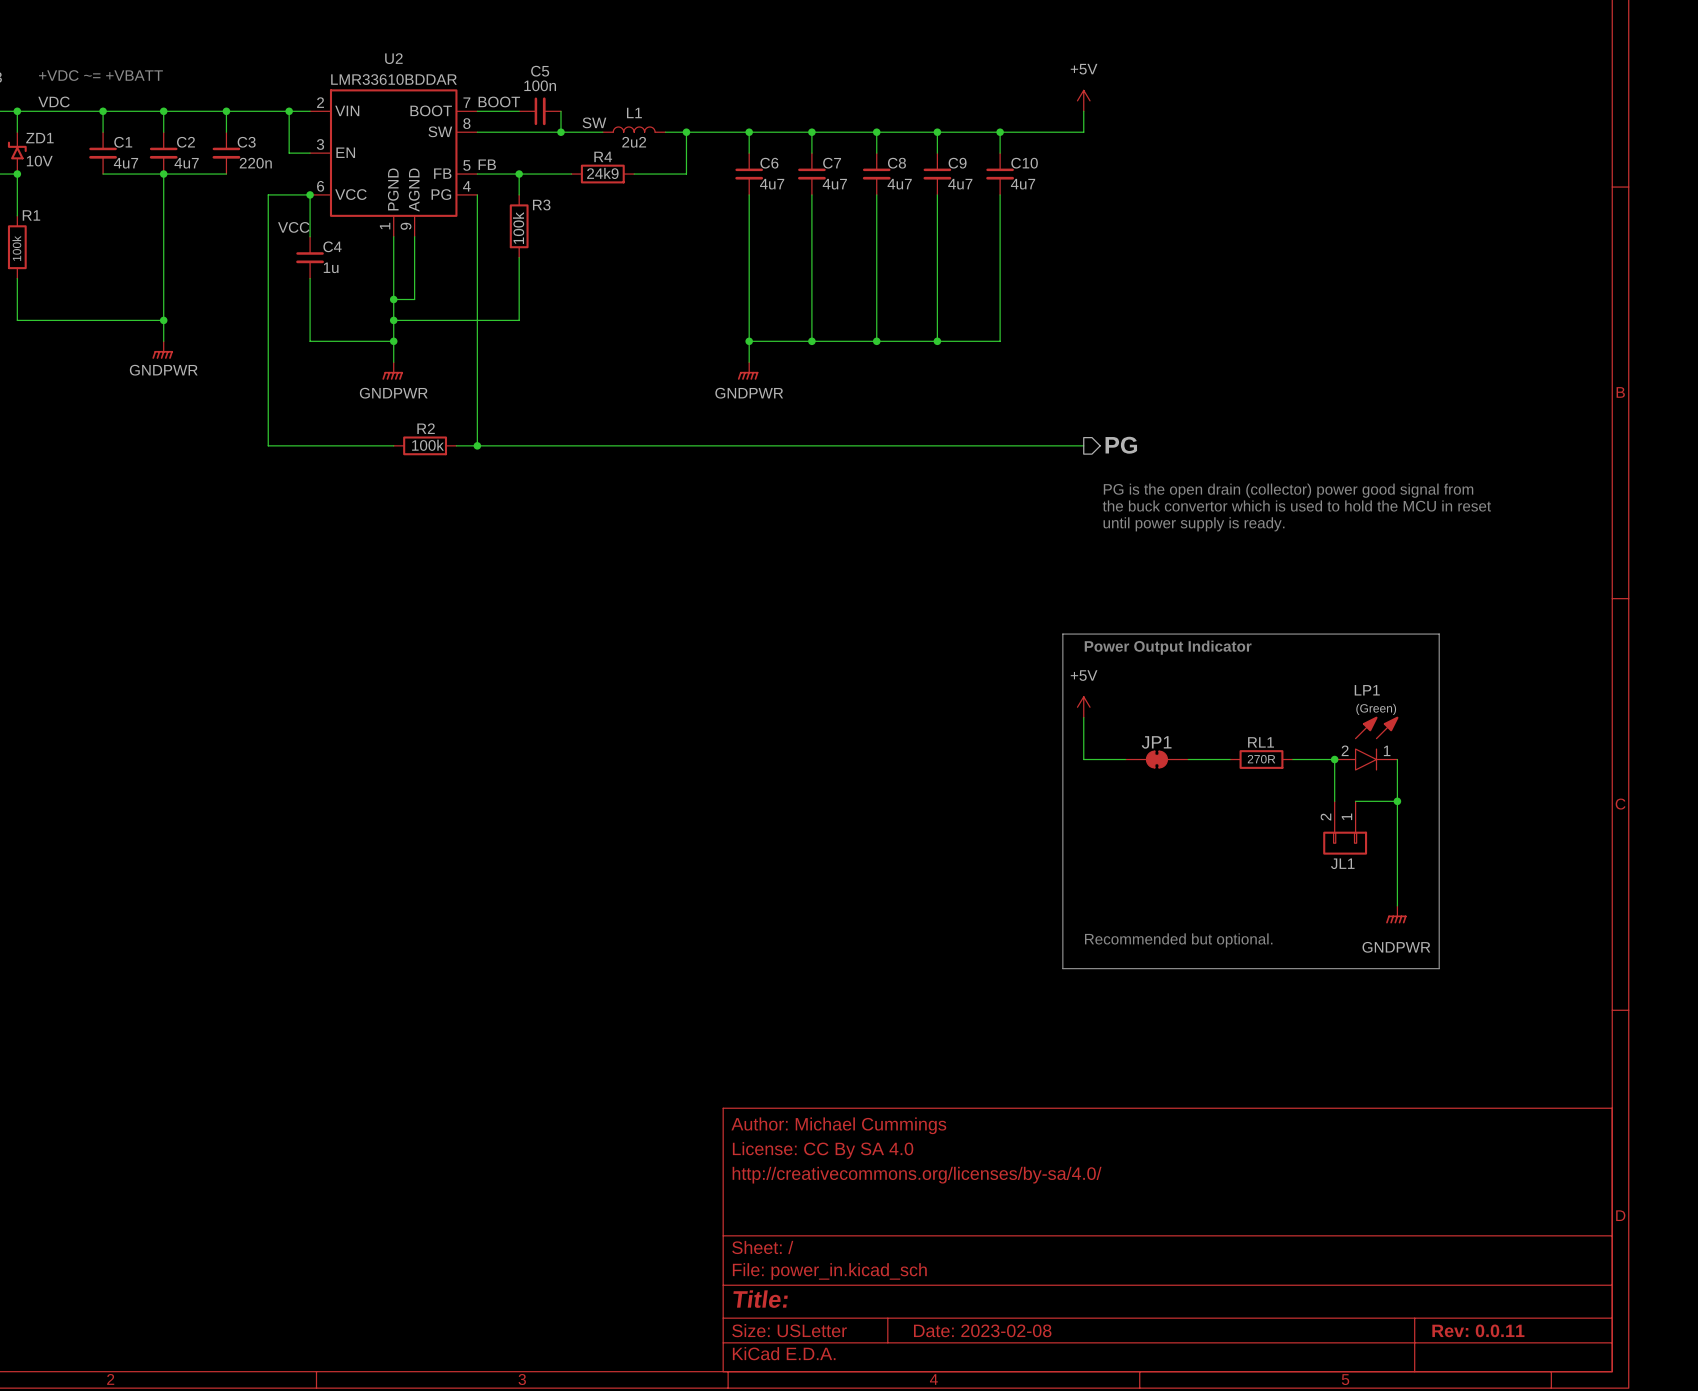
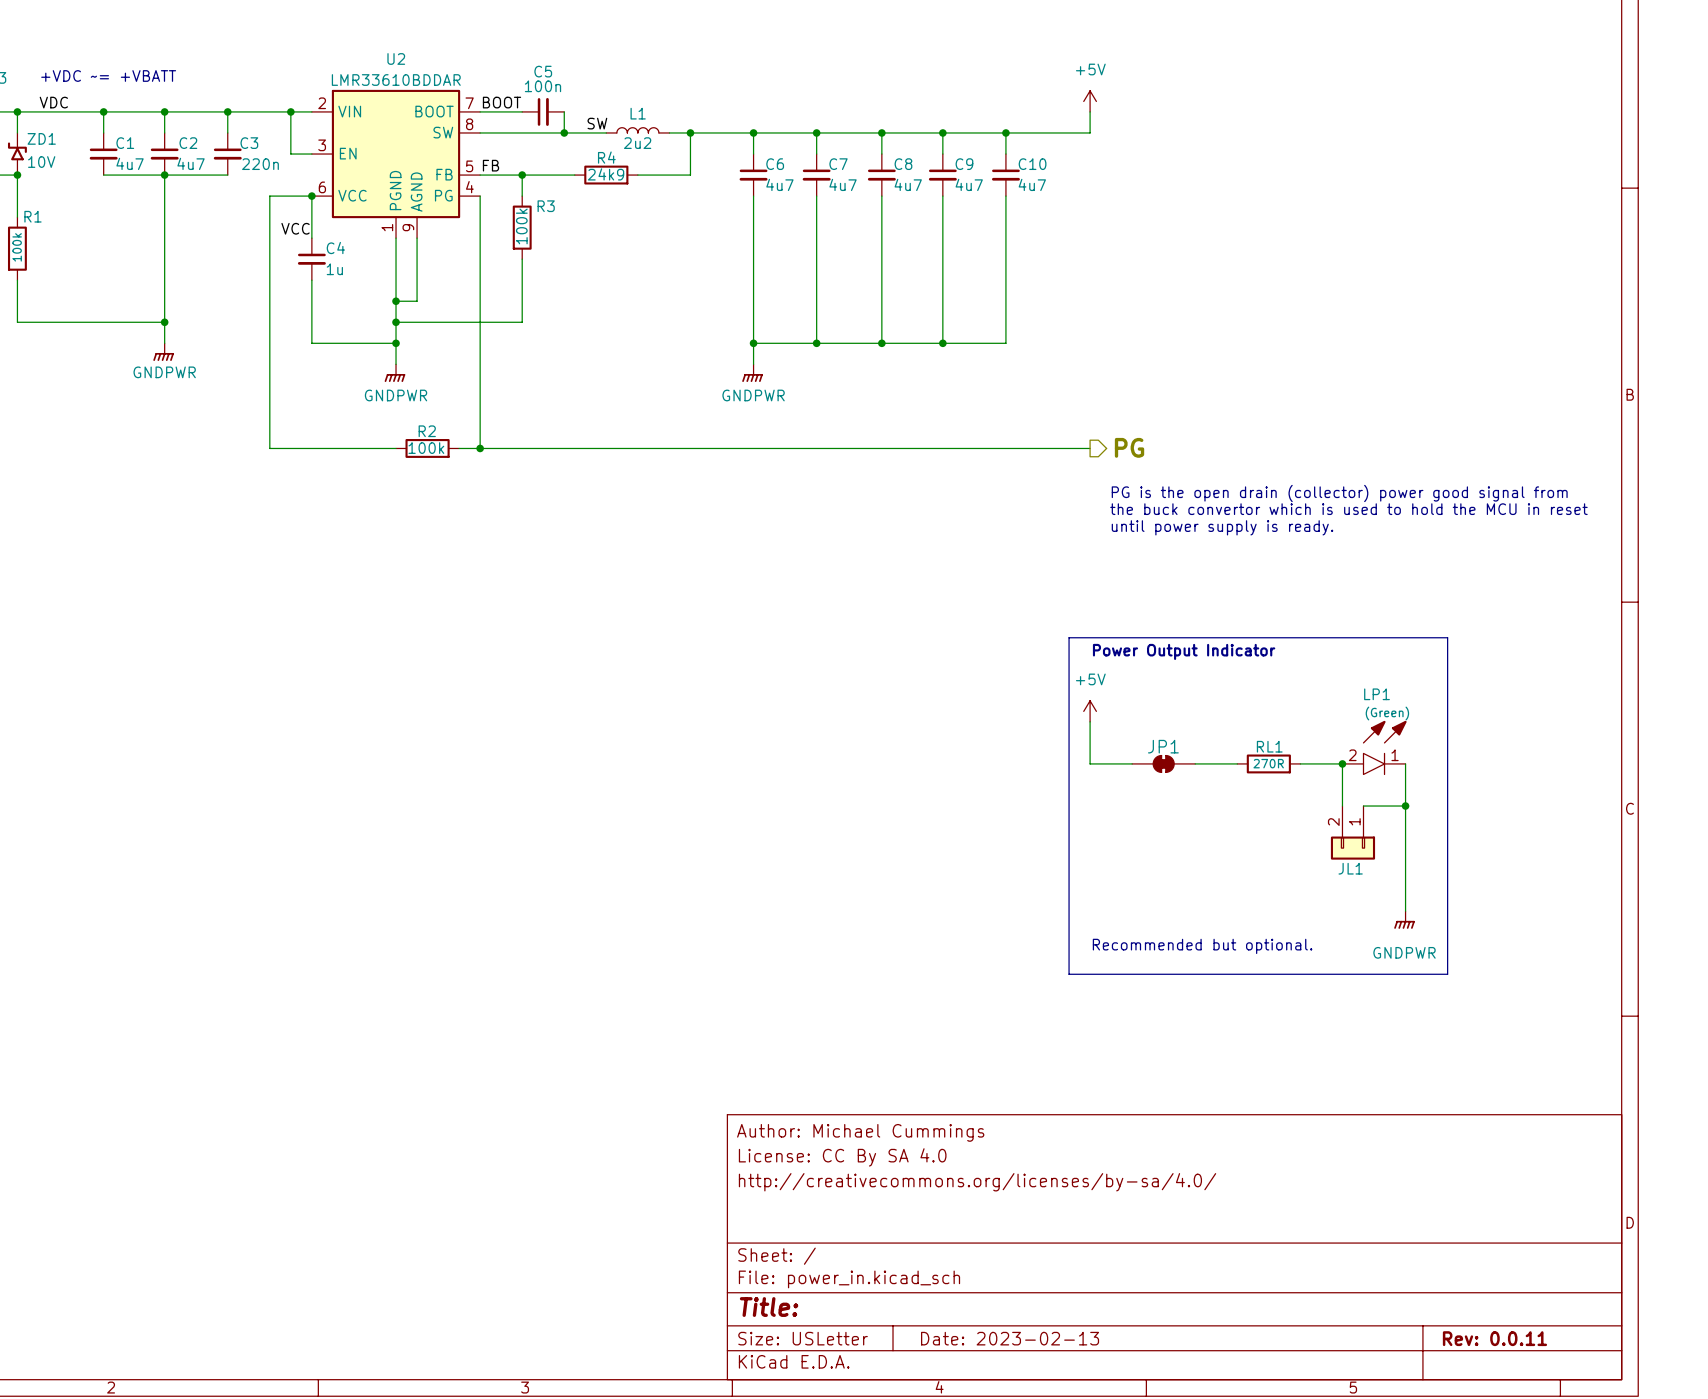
title block: Date: 2023-02-08 (982, 1330) -> Date: 2023-02-13 (1010, 1338)

